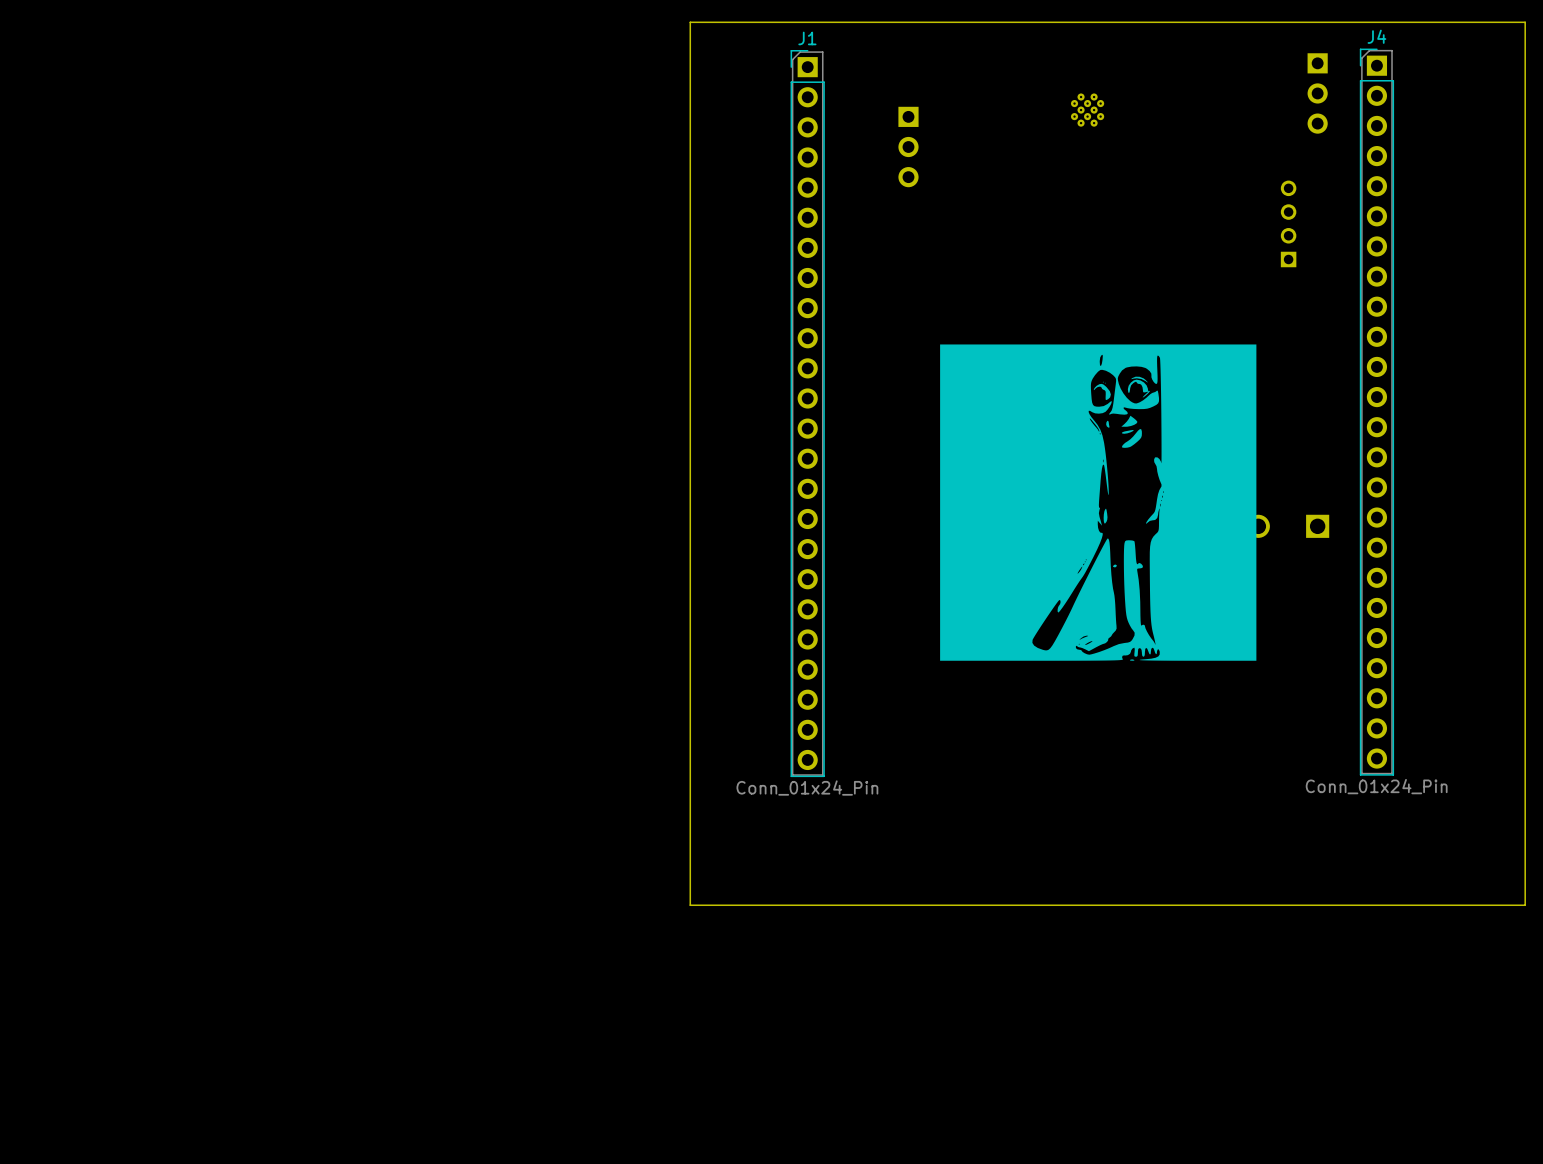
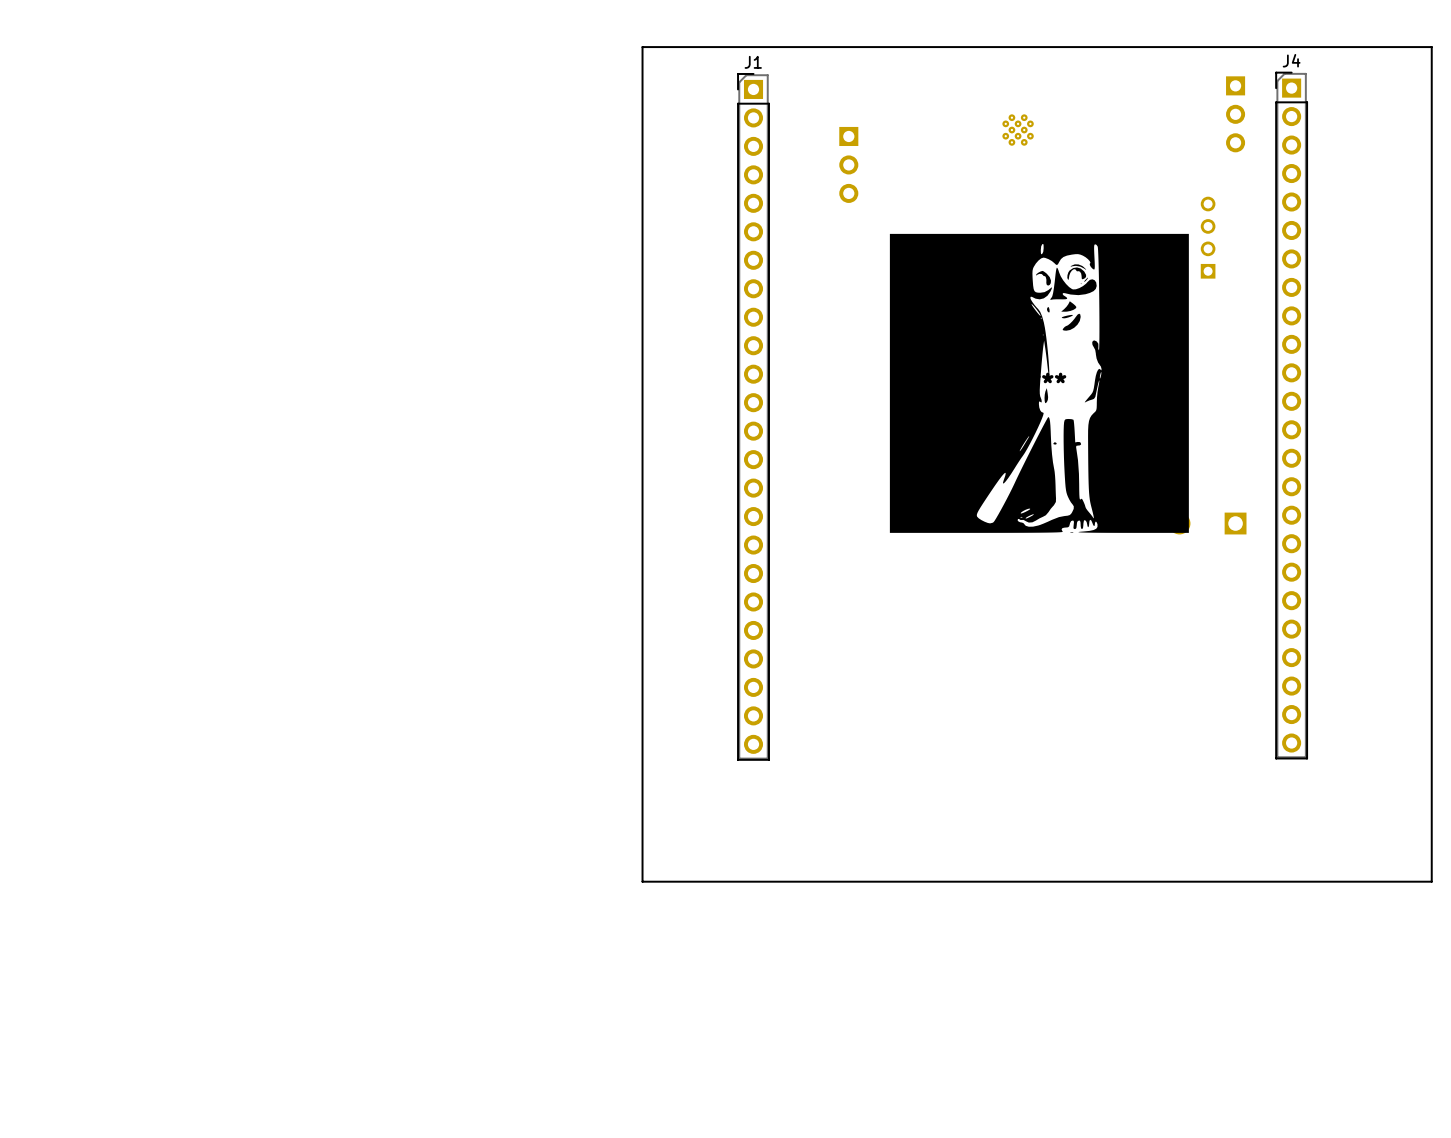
drawing: [940, 344, 1257, 661] -> none
part: none -> (1039, 383)
J4 value: Conn_01x24_Pin (1376, 786) -> none
J1 value: Conn_01x24_Pin (807, 788) -> none

